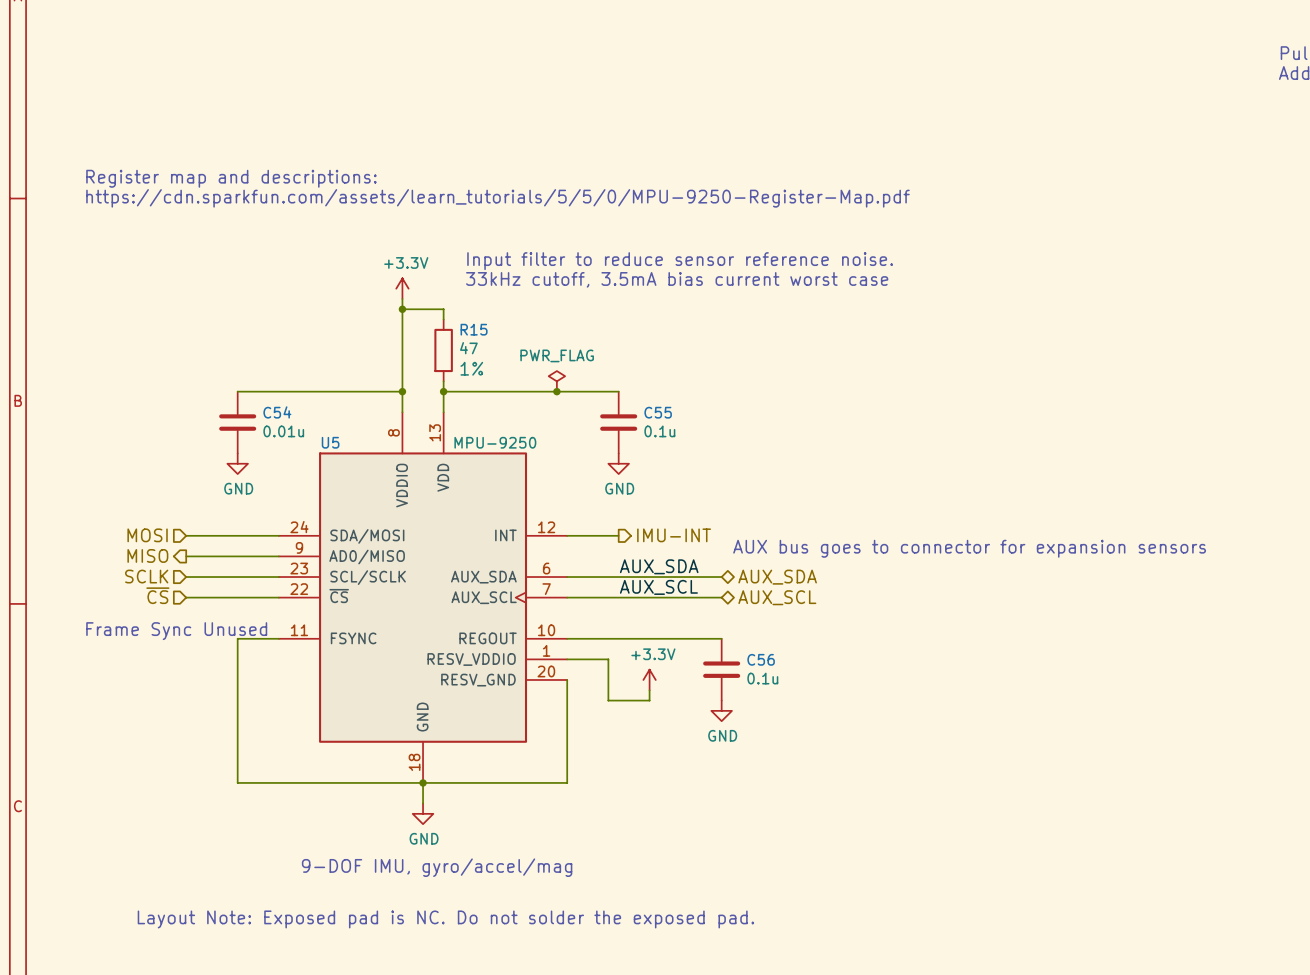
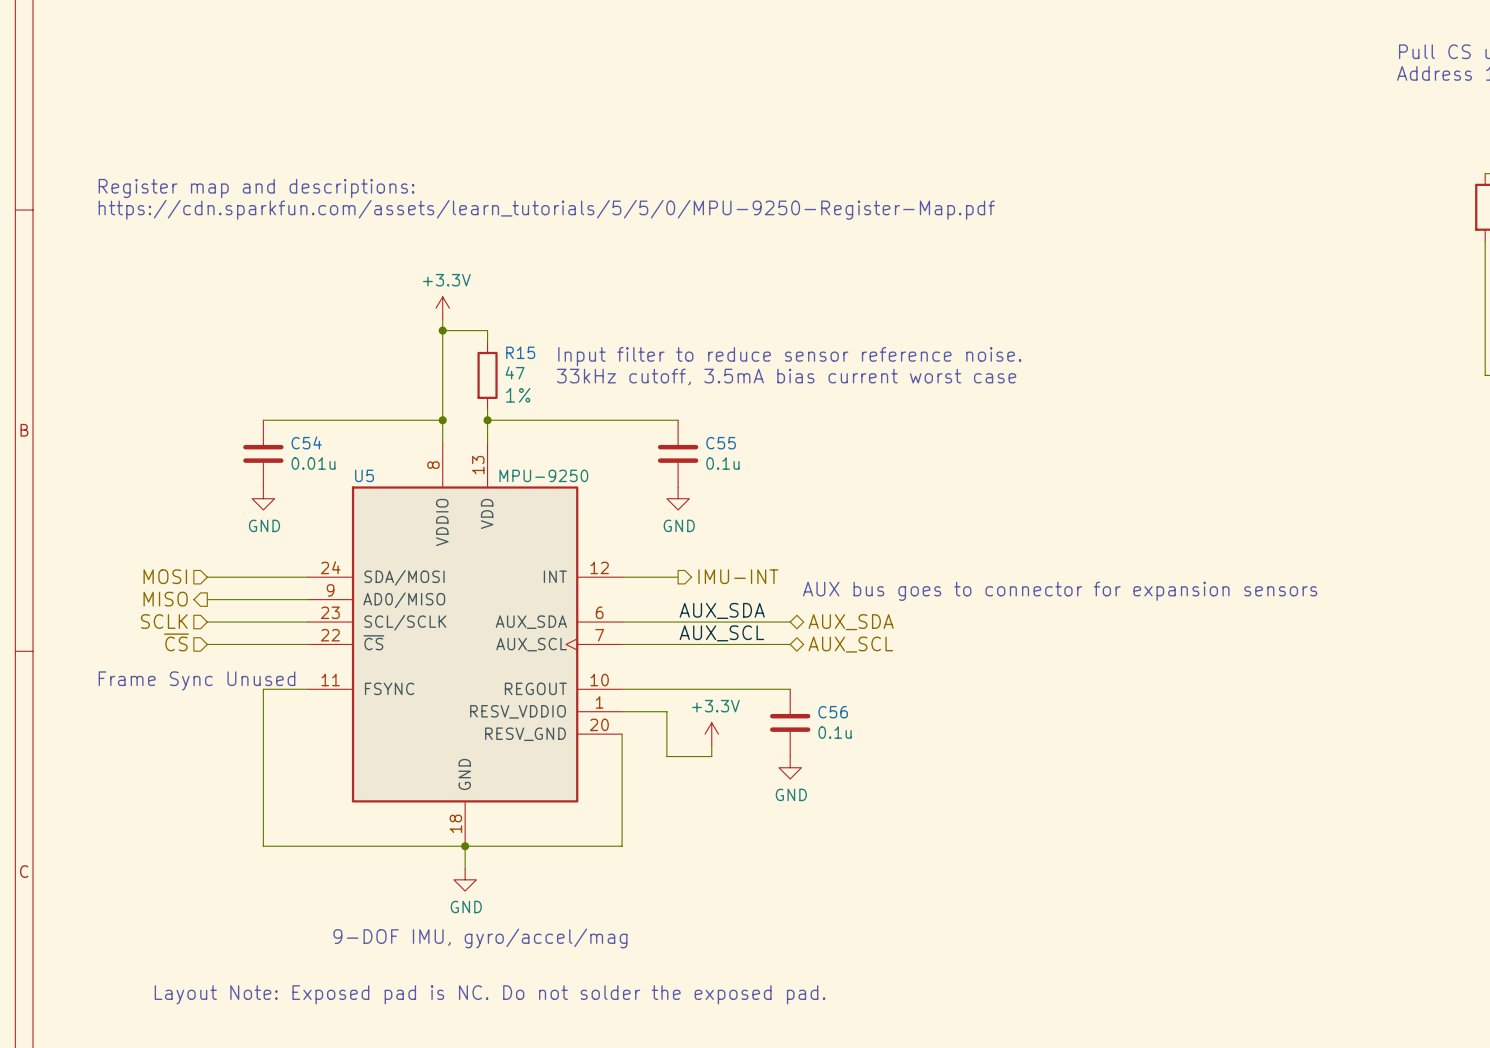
text position: Input filter to reduce sensor reference noise. (680, 261) -> Input filter to reduce sensor reference noise. (789, 356)
text position: 33kHz cutoff, 3.5mA bias current worst case (677, 279) -> 33kHz cutoff, 3.5mA bias current worst case (786, 377)
power symbol: PWR_FLAG (556, 381) -> none
junction: (556, 391) -> none

